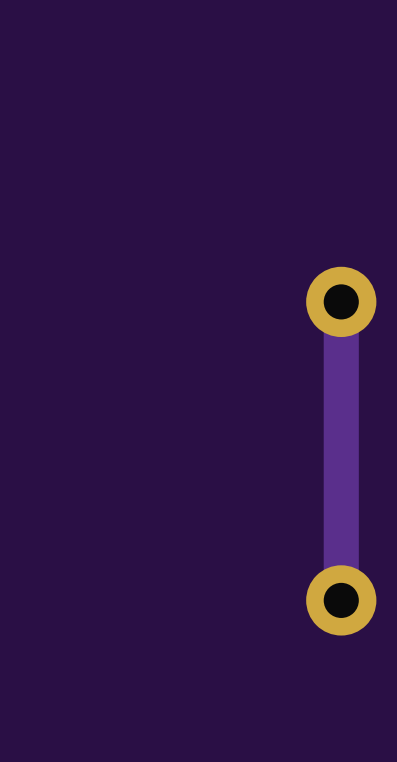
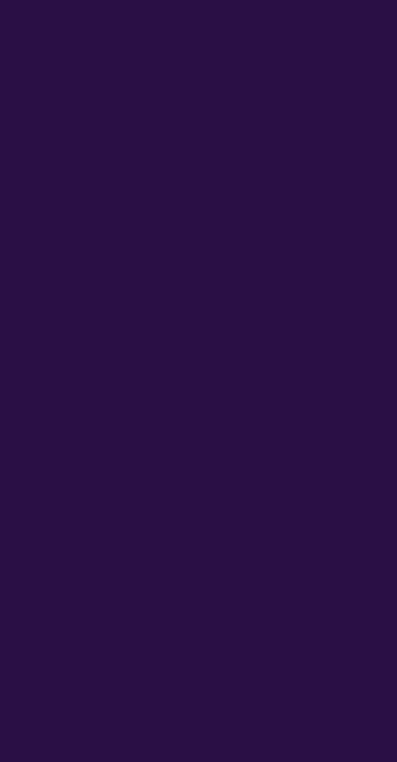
track: (341, 301) (341, 600) -> none
via: (341, 301) -> none
via: (341, 600) -> none

